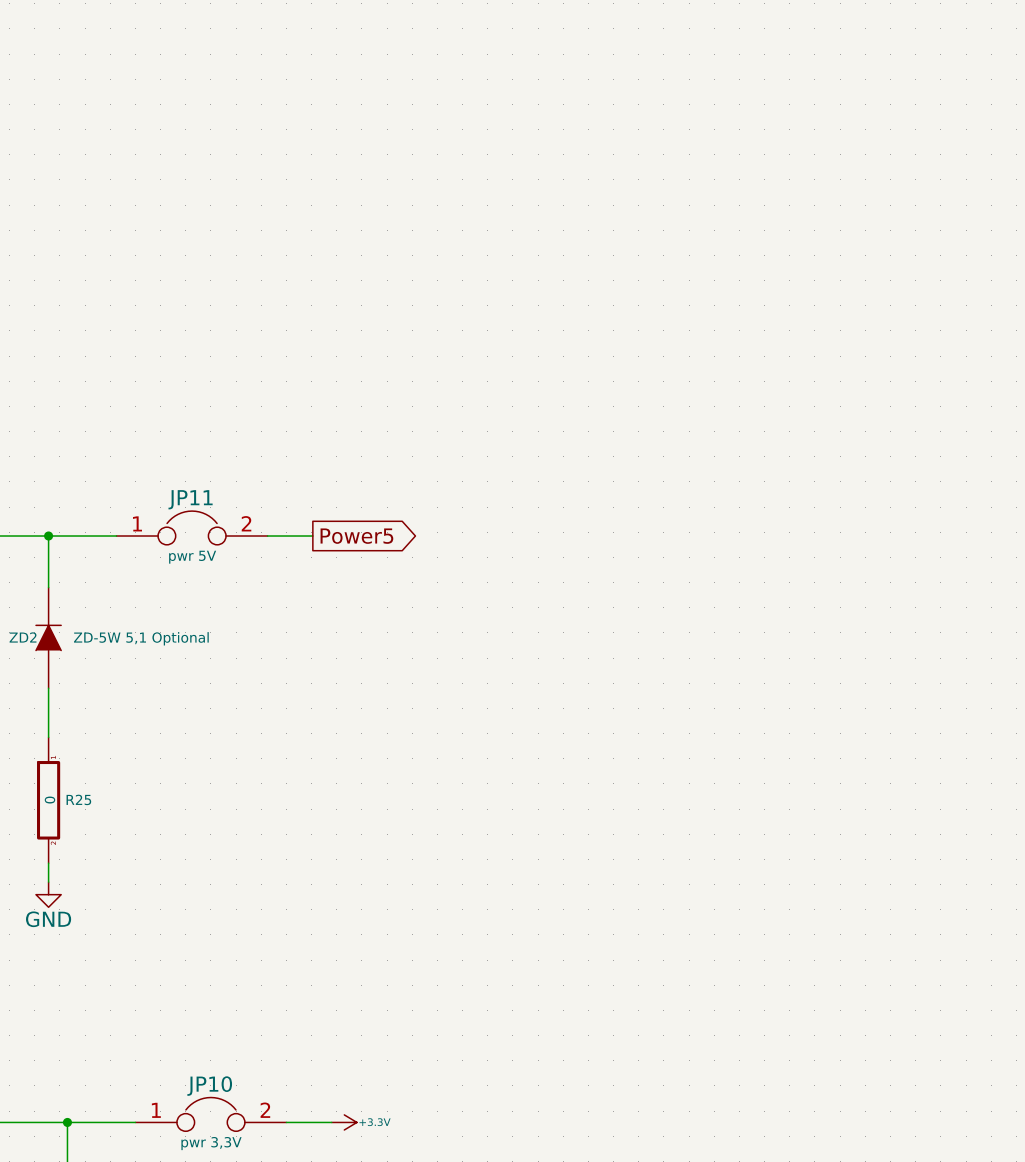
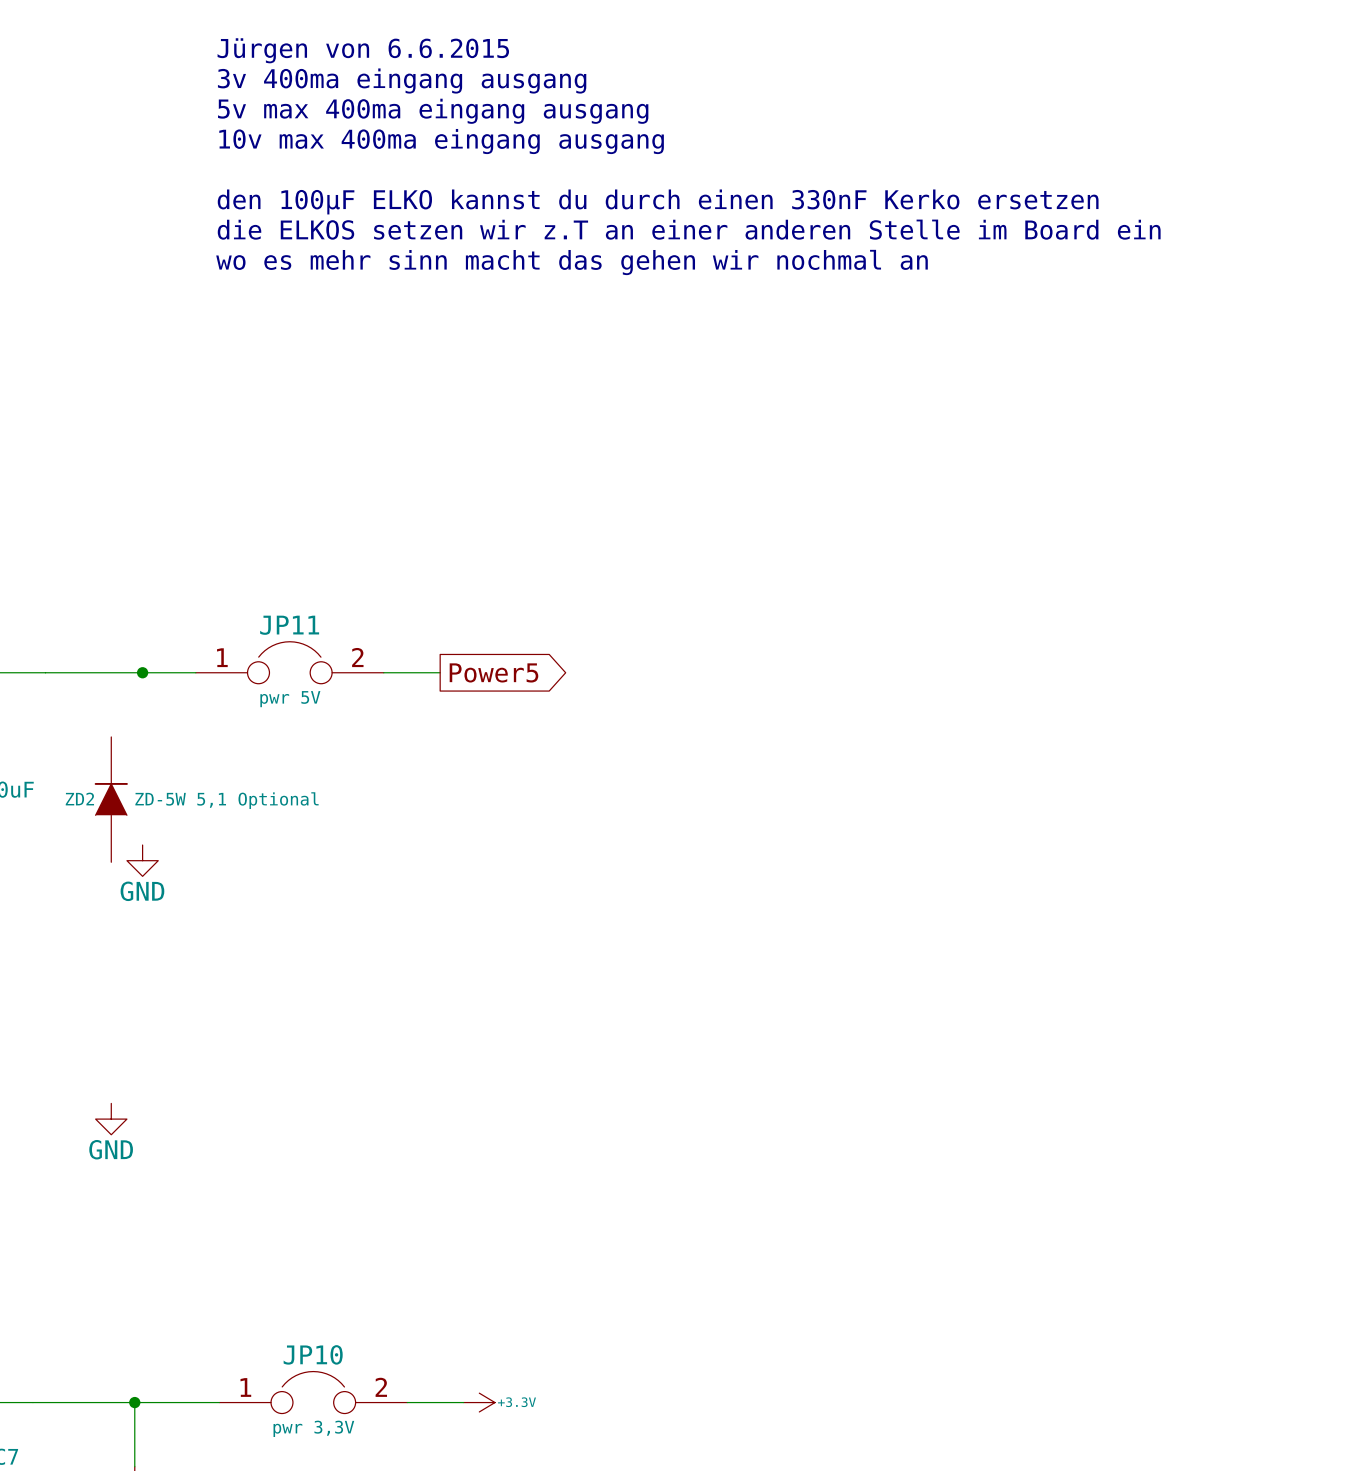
text: none -> Jürgen von 6.6.2015 (363, 50)
text: none -> 3v 400ma eingang ausgang (402, 81)
text: none -> 5v max 400ma eingang ausgang (433, 111)
text: none -> 10v max 400ma eingang ausgang (441, 141)
text: none -> den 100µF ELKO kannst du durch einen 330nF Kerko ersetzen (658, 201)
text: none -> die ELKOS setzen wir z.T an einer anderen Stelle im Board ein (689, 229)
text: none -> wo es mehr sinn macht das gehen wir nochmal an (572, 262)
wire: (48, 536) (48, 587) -> none
junction position: (48, 536) -> (142, 672)
power symbol: none -> GND (142, 860)
wire: (48, 688) (48, 737) -> none
R25: 0 (48, 800) -> none
wire: (48, 863) (48, 882) -> none

